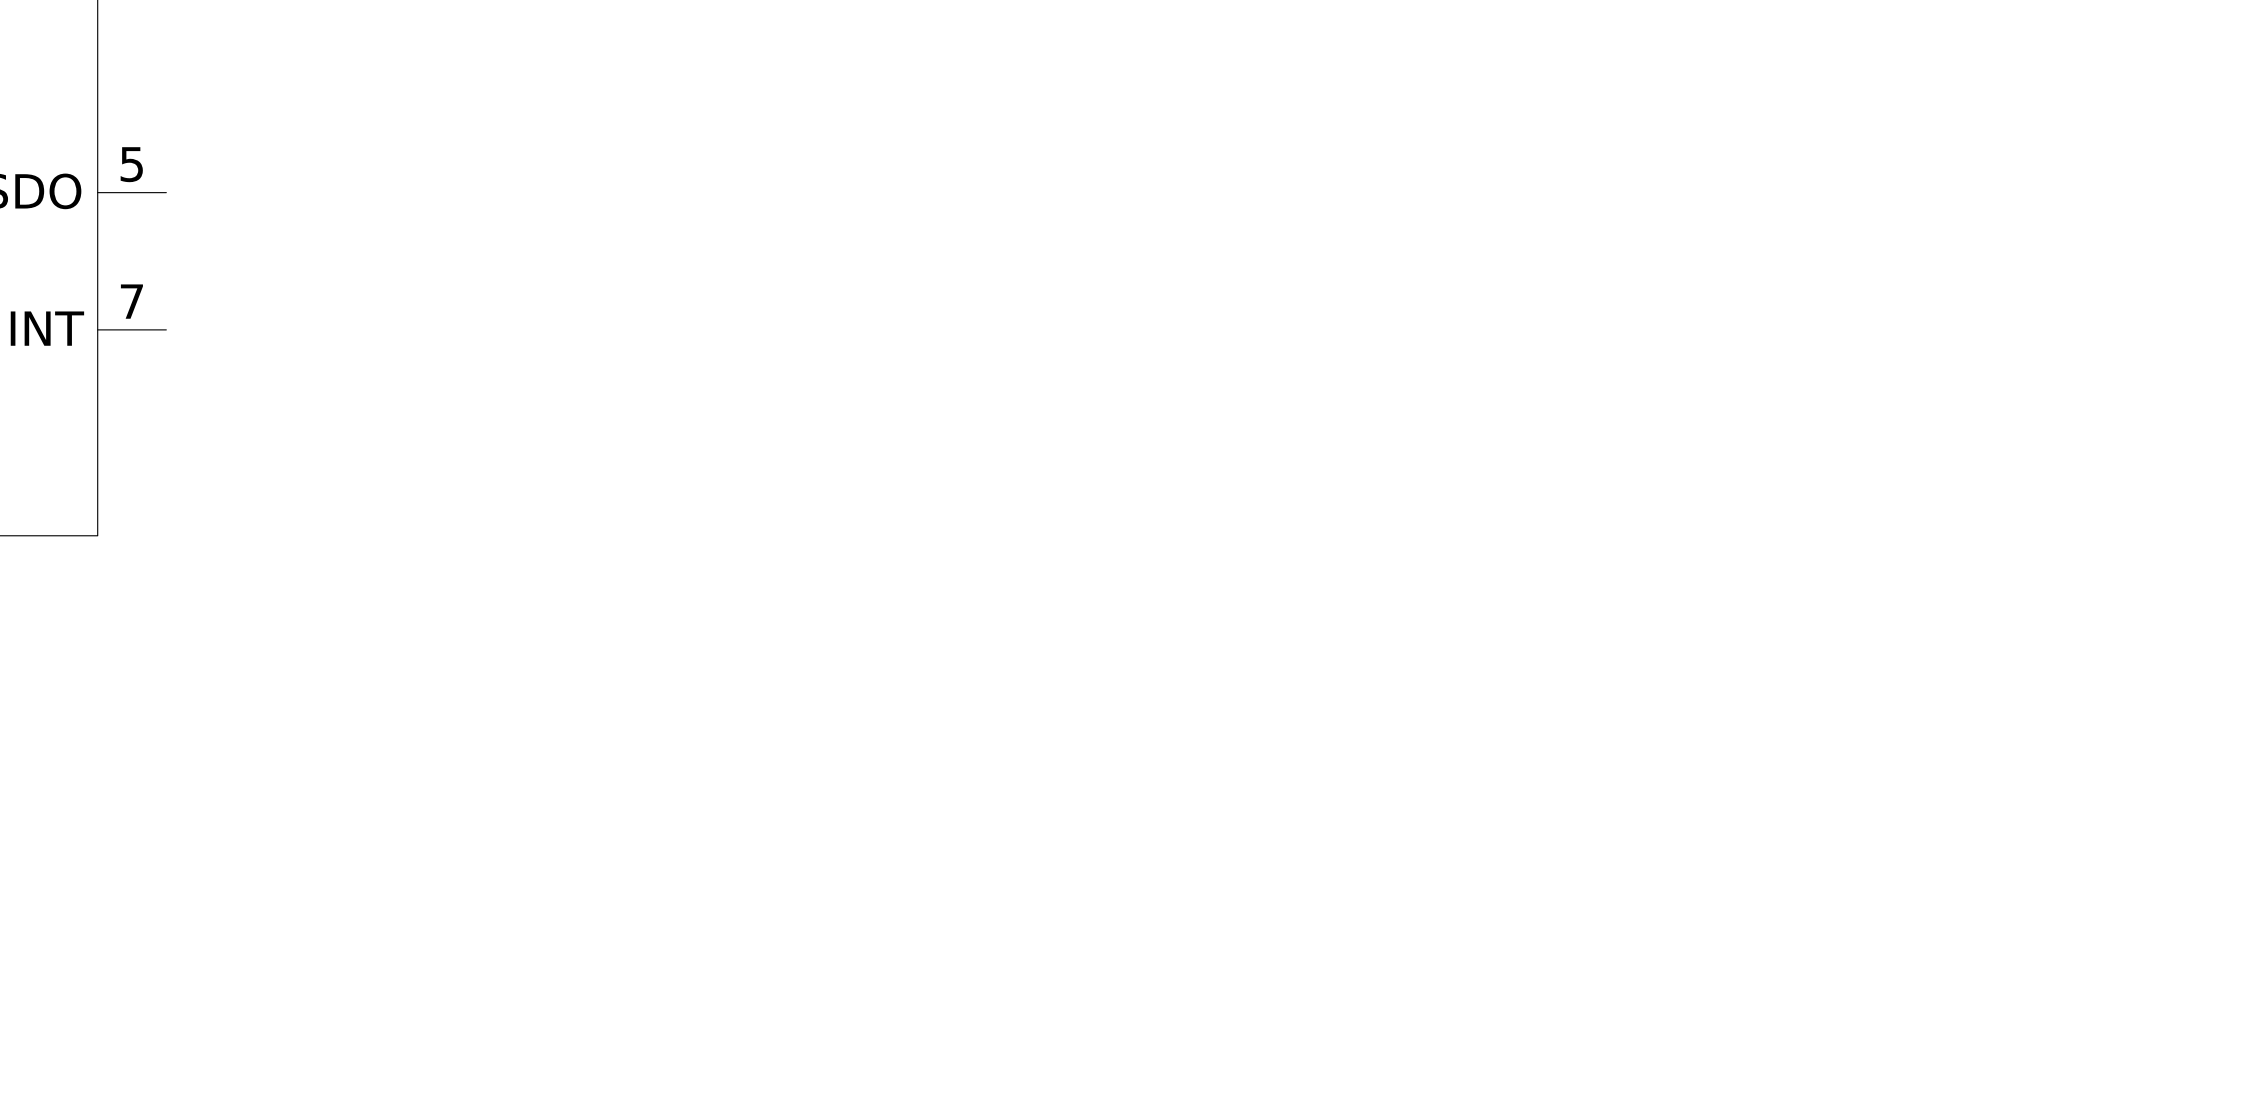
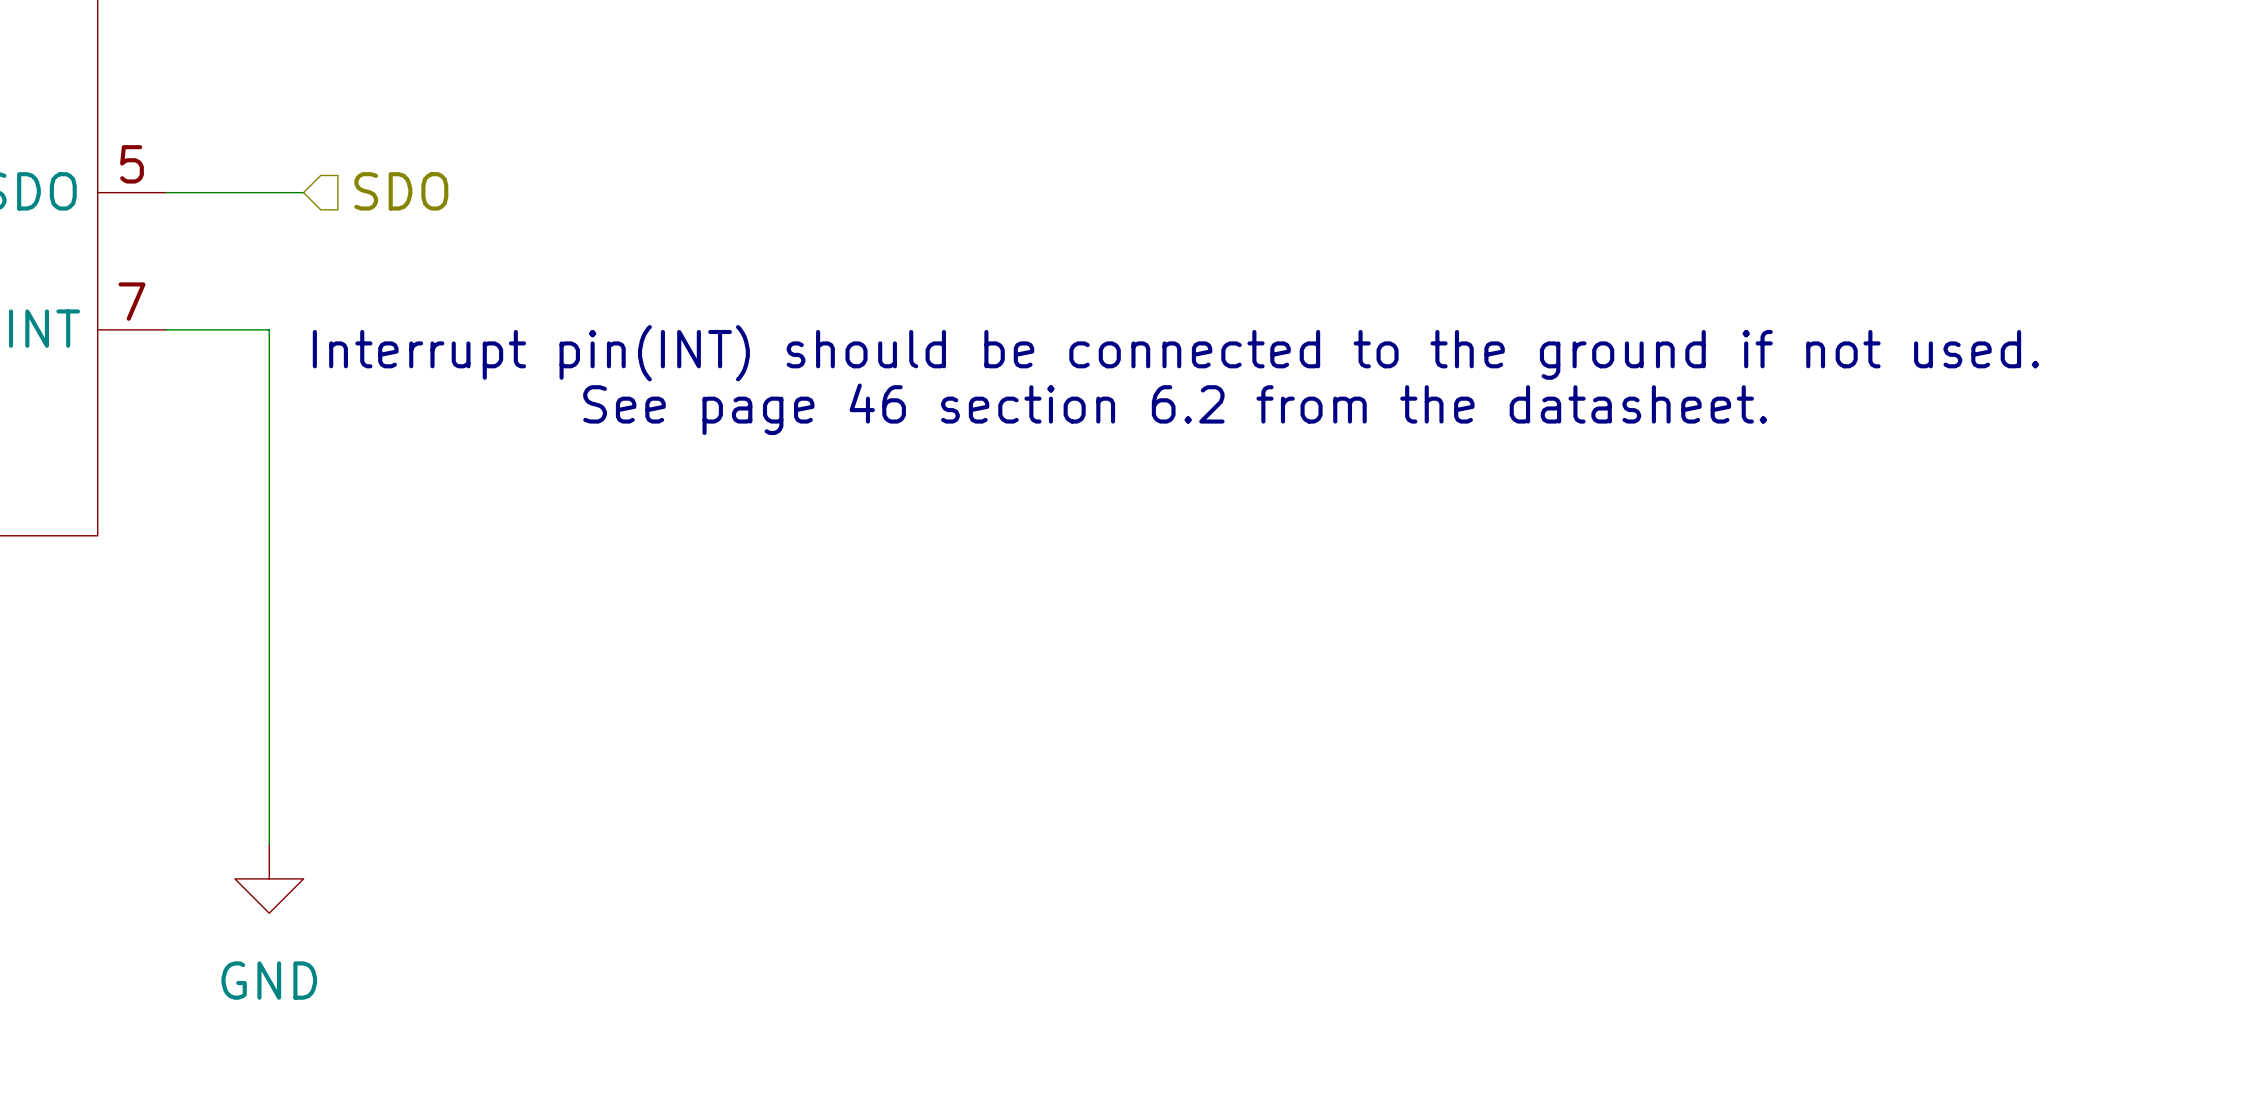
hierarchical label: none -> SDO (401, 191)
wire: none -> (166, 192) (303, 192)
wire: none -> (166, 329) (269, 329) (269, 844)
text: none -> Interrupt pin(INT) should be connected to the ground if not used. (1175, 353)
text: none -> See page 46 section 6.2 from the datasheet. (1175, 409)
power symbol: none -> GND (269, 878)

